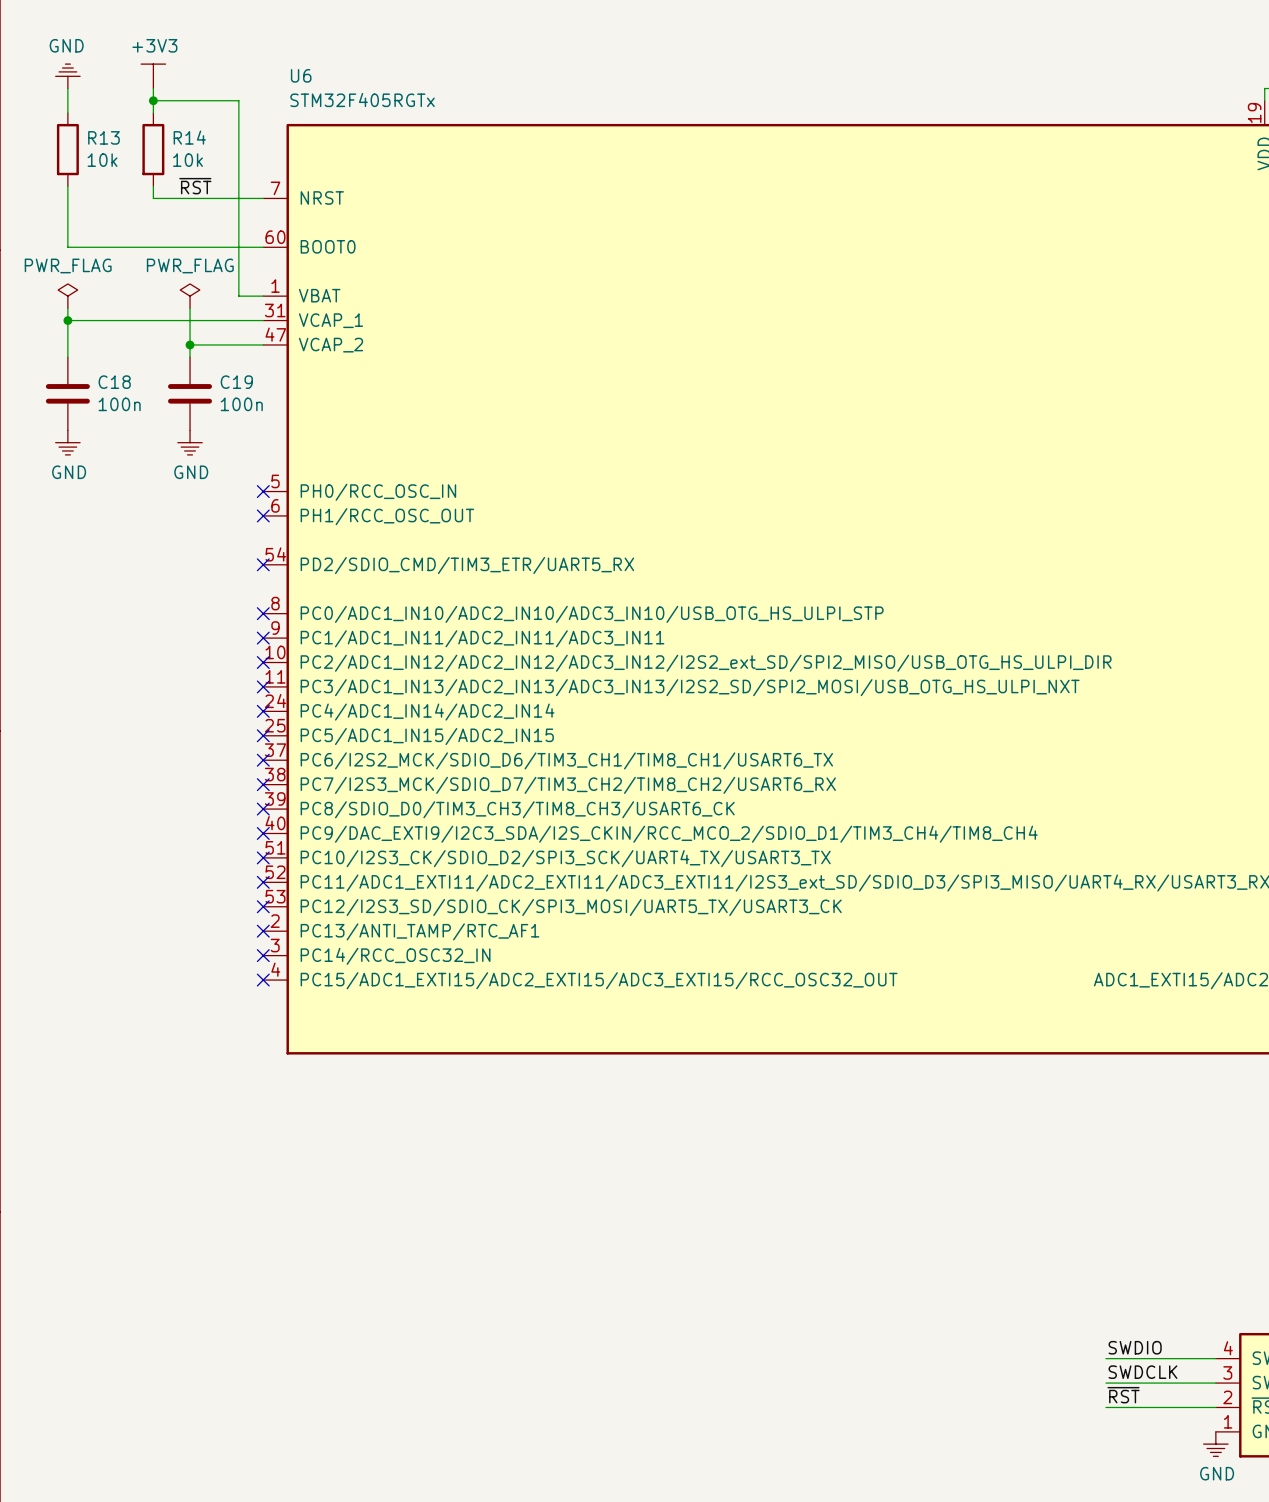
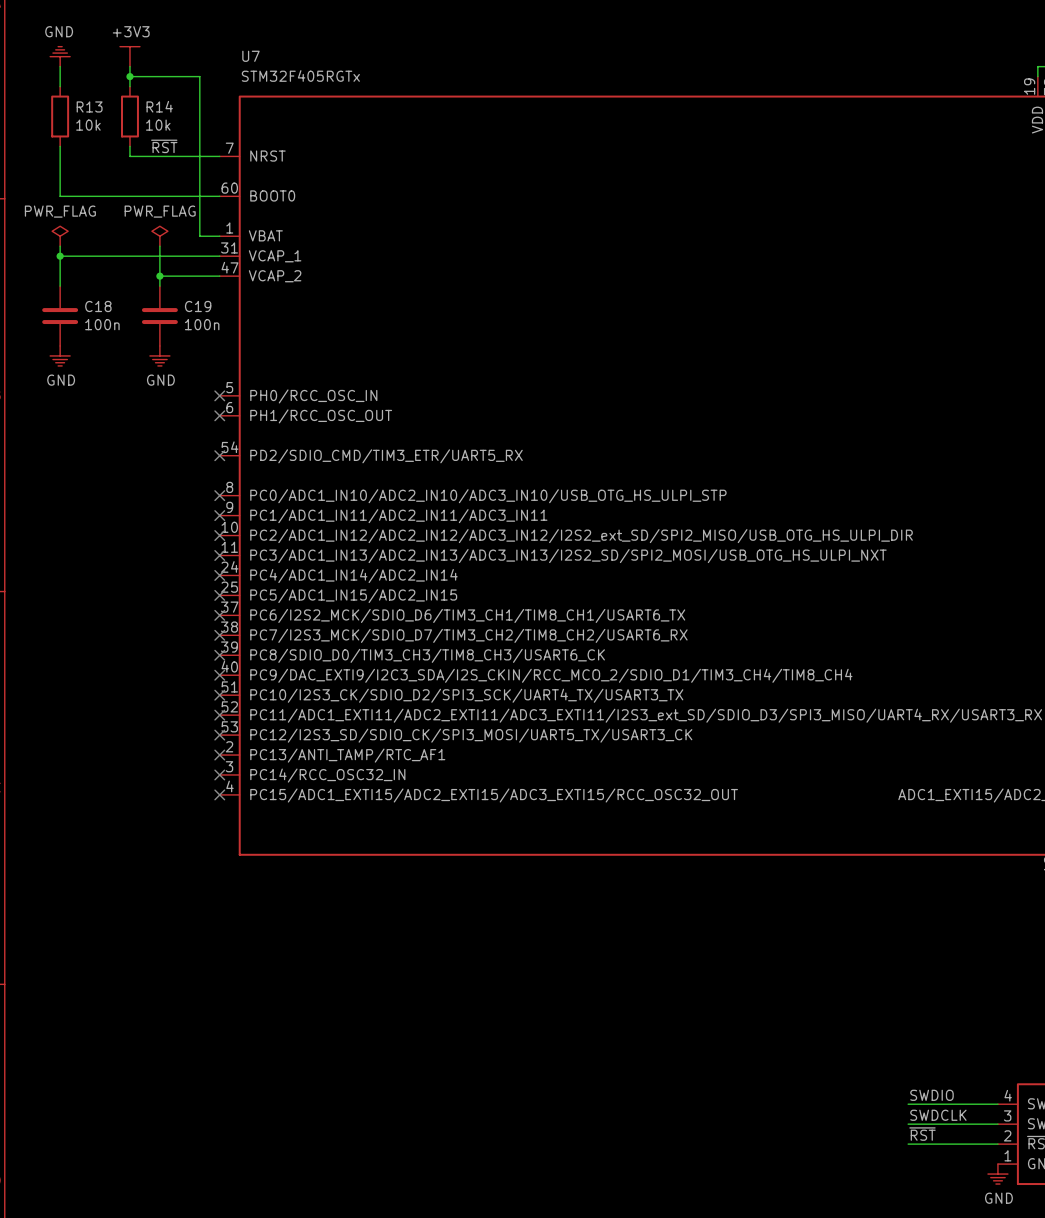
U6 name: U6 (301, 75) -> U7 (250, 56)

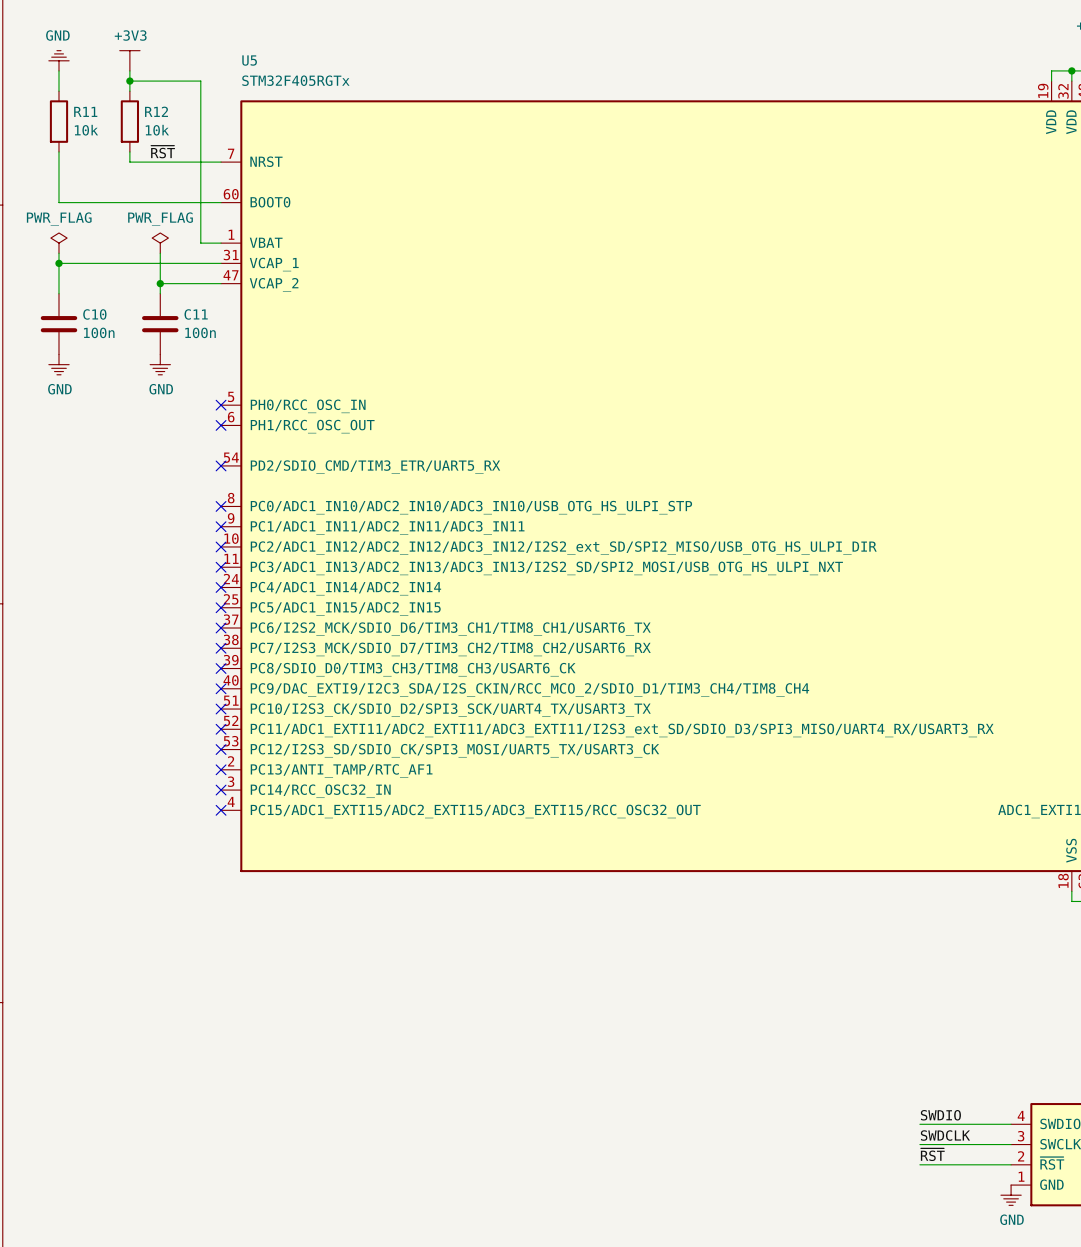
U7 name: U7 (250, 56) -> U5 (249, 60)
R13 name: R13 (89, 106) -> R11 (85, 111)
R14 name: R14 (159, 106) -> R12 (156, 111)
C18 name: C18 (98, 306) -> C10 (94, 314)
C19 name: C19 (198, 306) -> C11 (196, 314)

